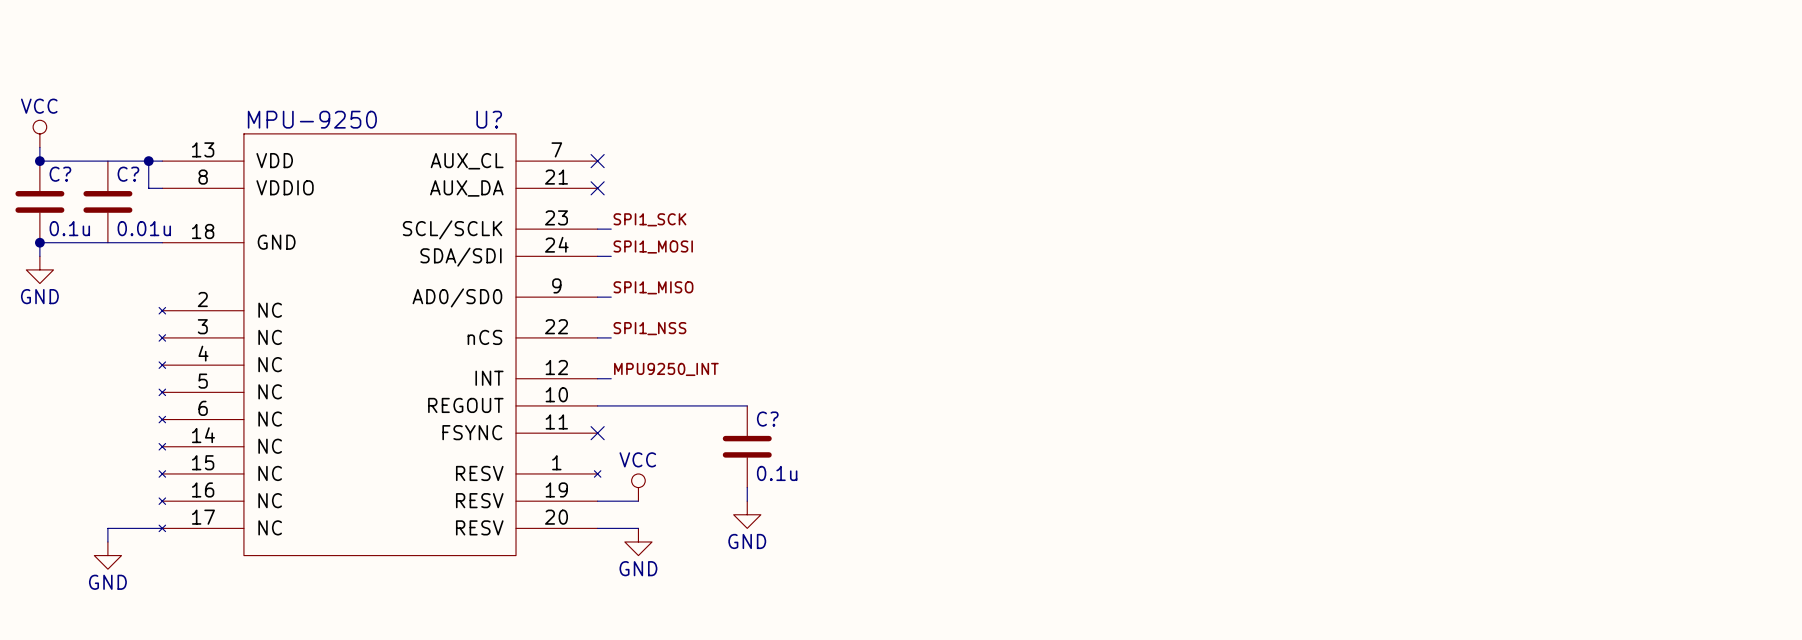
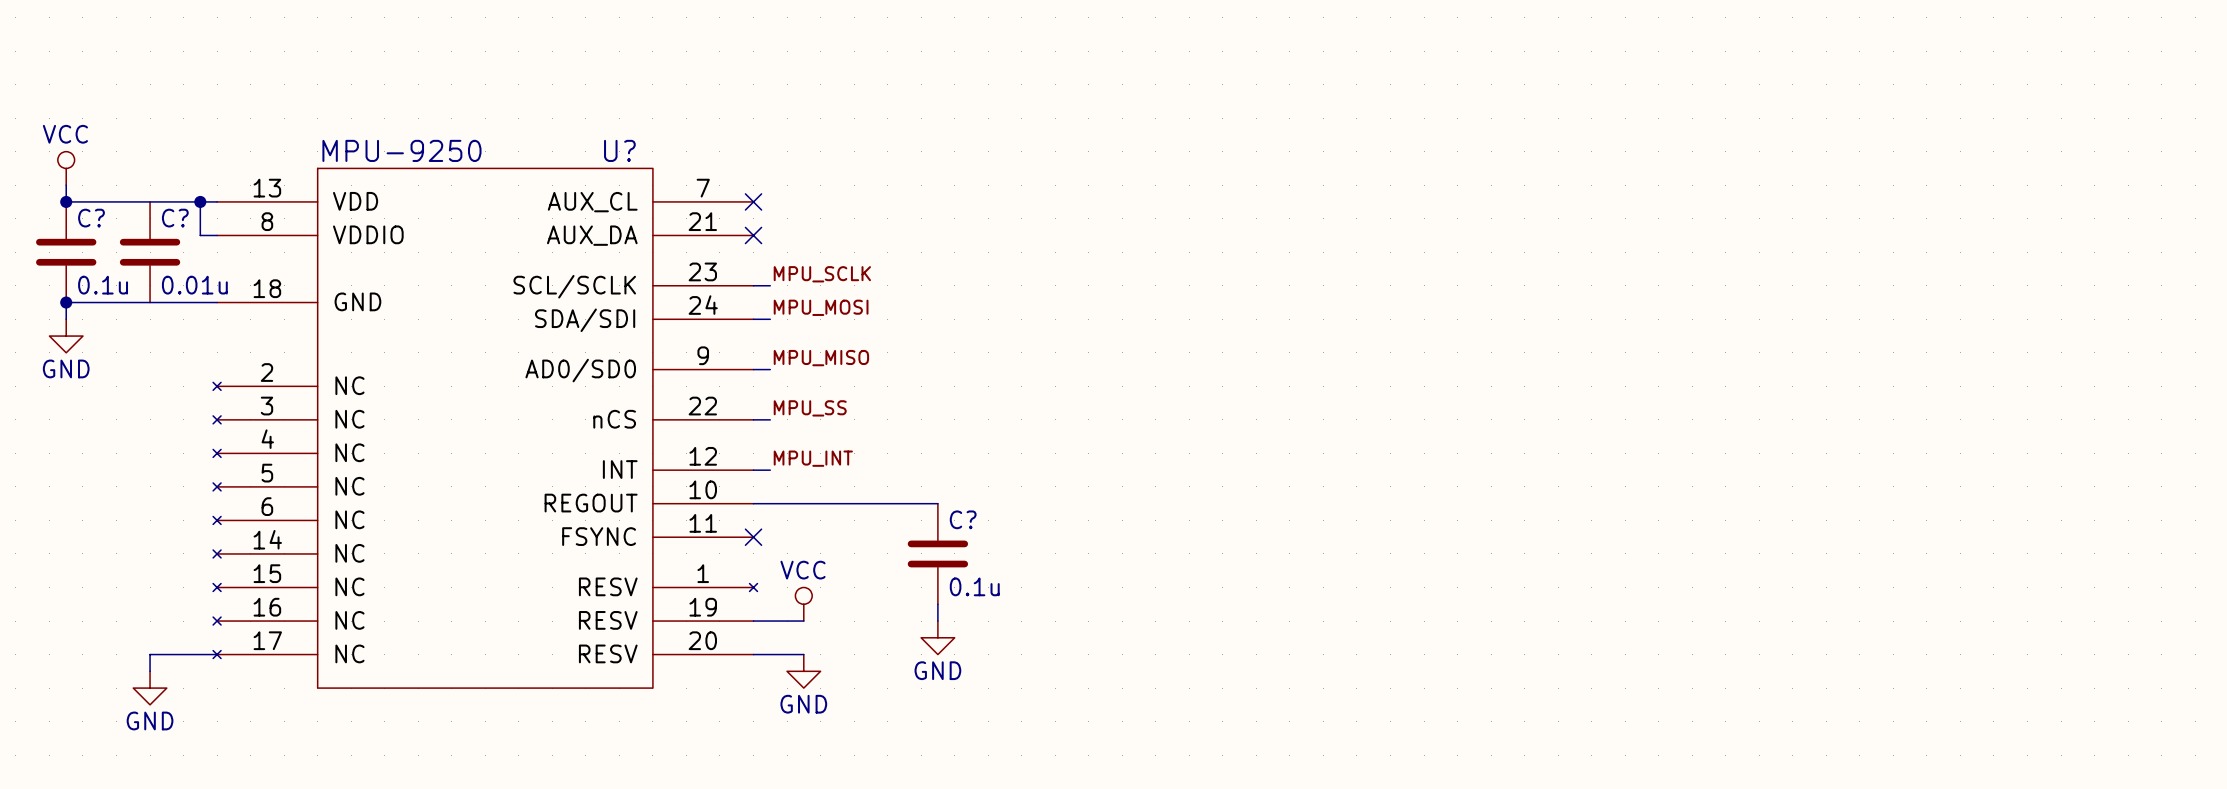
label: SPI1_SCK (649, 219) -> MPU_SCLK (822, 274)
label: SPI1_MOSI (653, 247) -> MPU_MOSI (821, 307)
label: SPI1_MISO (653, 287) -> MPU_MISO (821, 358)
label: SPI1_NSS (649, 328) -> MPU_SS (810, 408)
label: MPU9250_INT (666, 369) -> MPU_INT (813, 458)

